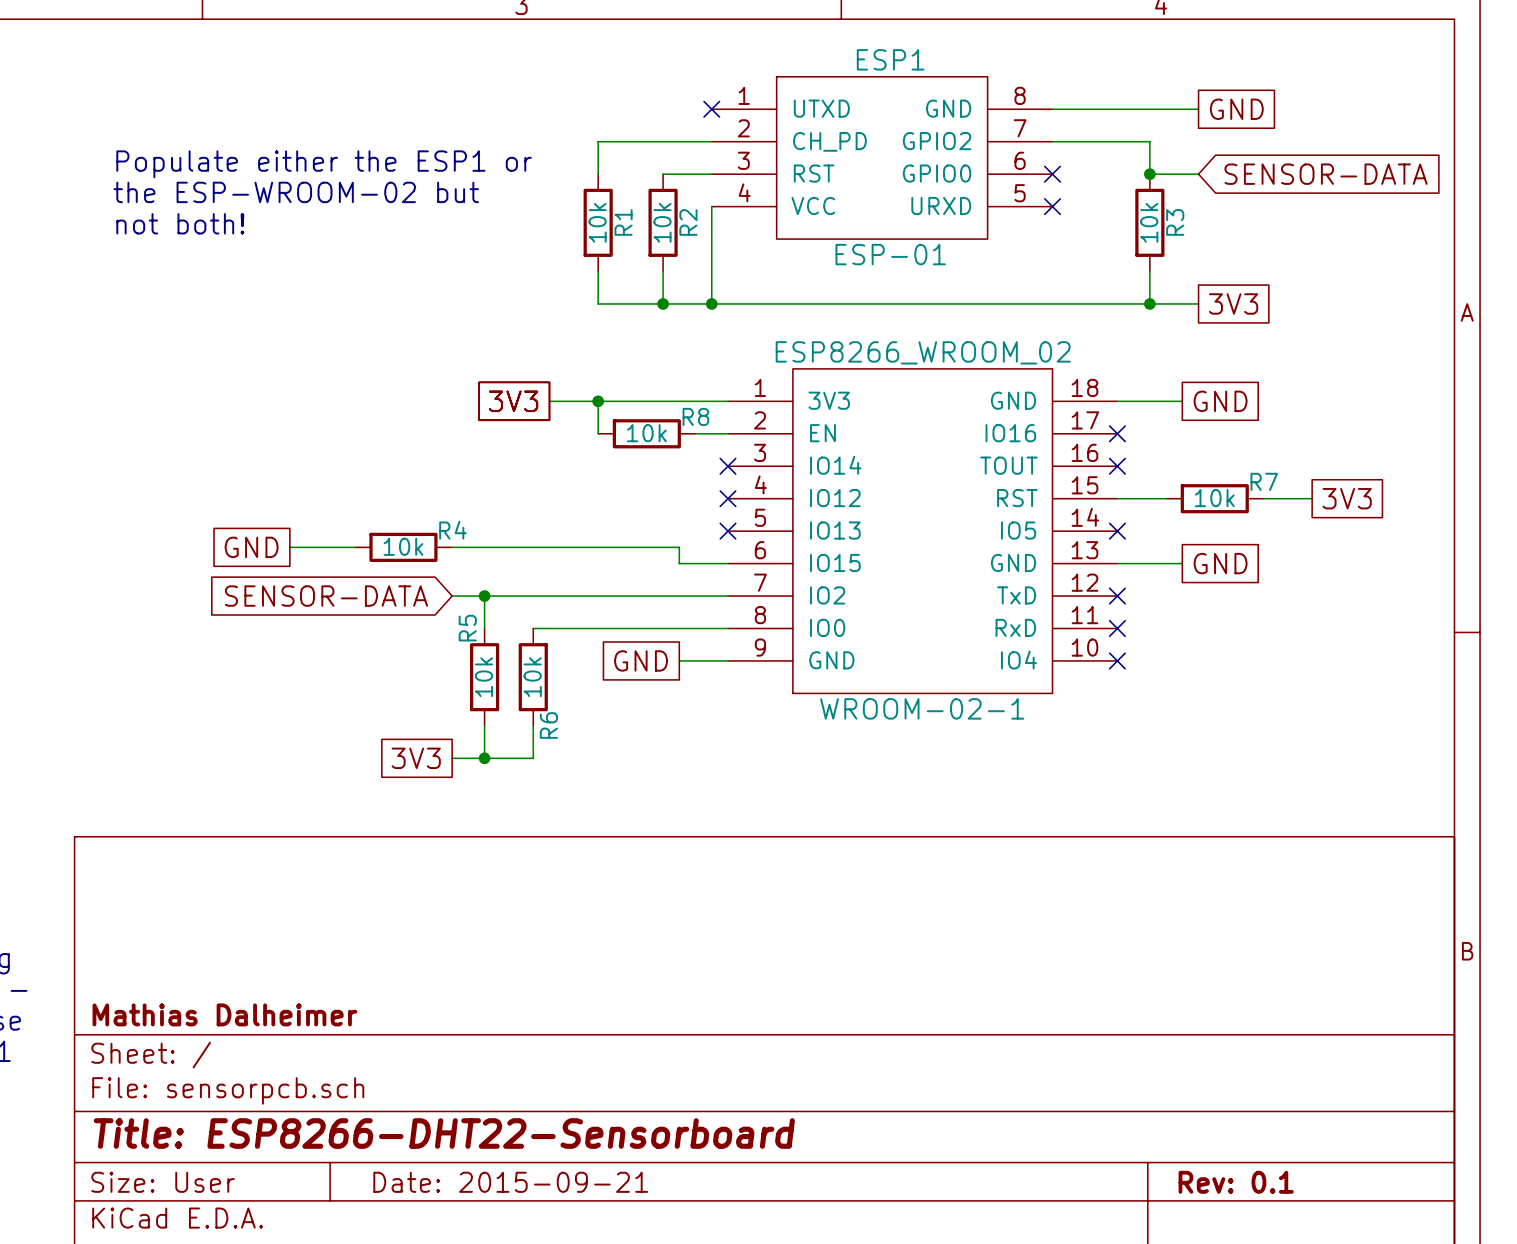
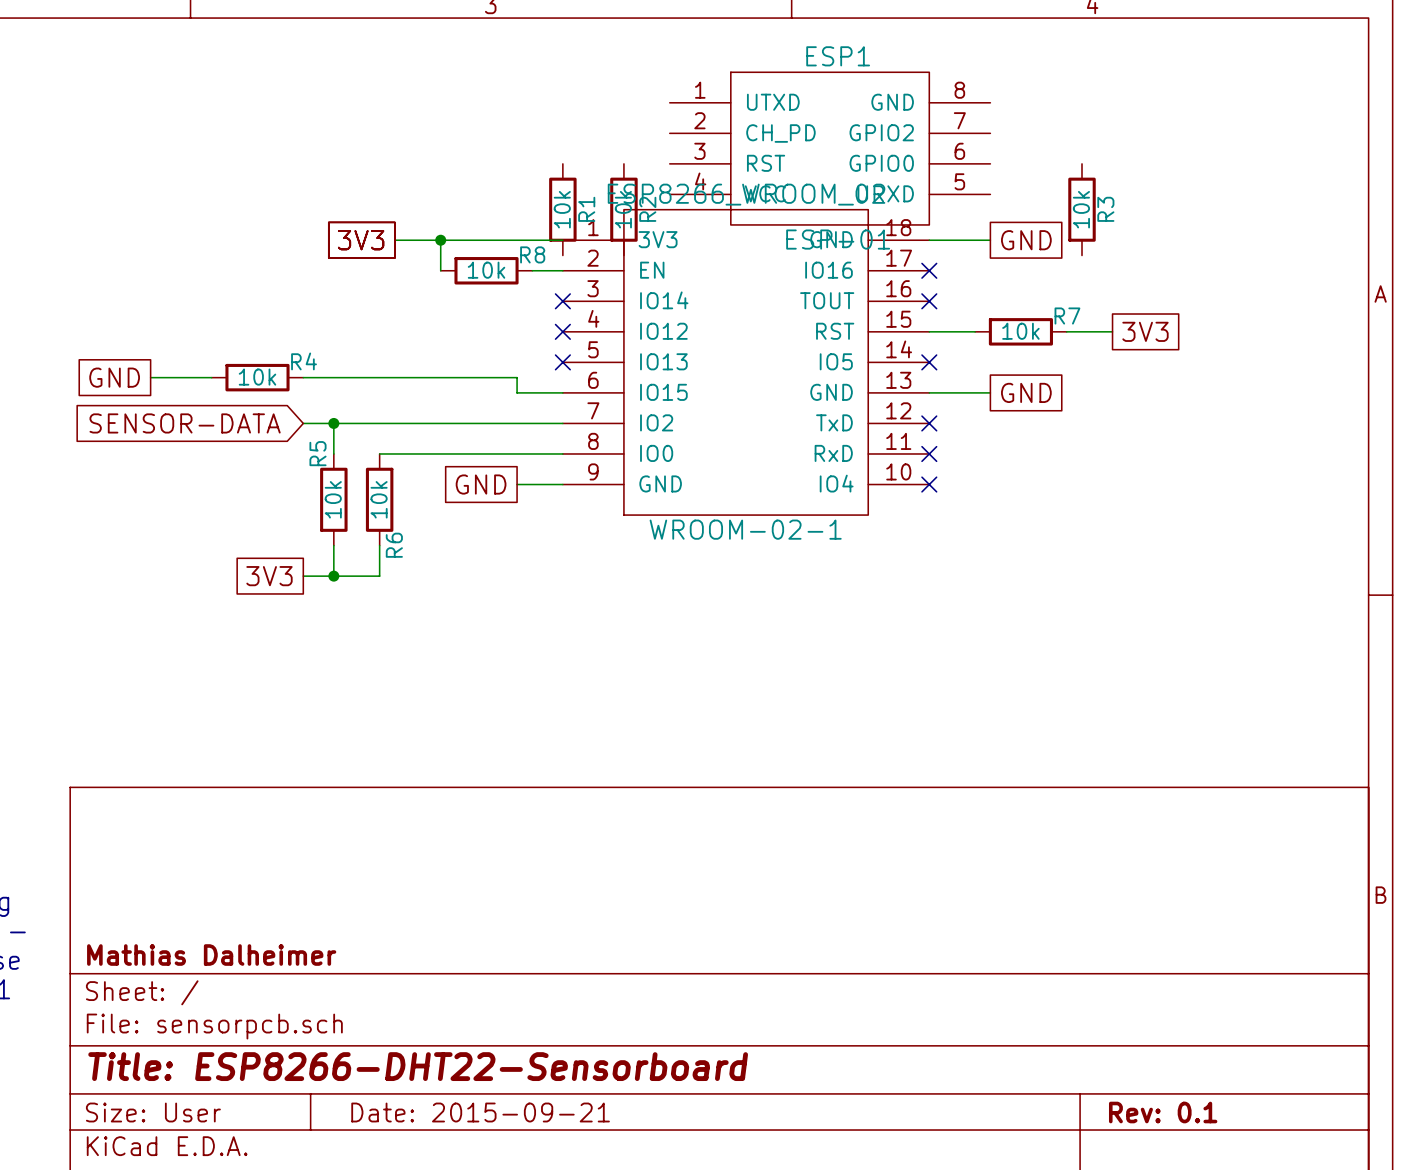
no-connect mark: (711, 109) -> none
wire: (1052, 109) (1198, 109) -> none
global label: GND (1236, 109) -> none
wire: (711, 141) (598, 141) (598, 174) -> none
wire: (1052, 141) (1149, 141) (1149, 174) (1198, 174) -> none
text: Populate either the ESP1 or (324, 164) -> none
wire: (663, 174) (711, 174) -> none
no-connect mark: (1052, 174) -> none
junction: (1149, 174) -> none
global label: SENSOR-DATA (1326, 174) -> none
text: the ESP-WROOM-02 but (296, 192) -> none
wire: (711, 206) (711, 303) -> none
no-connect mark: (1052, 206) -> none
text: not both! (180, 223) -> none
global label: none -> 3V3 (361, 240)
junction: none -> (440, 240)
global label: none -> GND (1026, 240)
wire: (598, 271) (598, 303) (1198, 303) -> none
wire: (1149, 271) (1149, 303) -> none
no-connect mark: none -> (929, 270)
junction: (663, 303) -> none
junction: (711, 303) -> none
junction: (1149, 303) -> none
global label position: 3V3 (1233, 303) -> 3V3 (1145, 331)
no-connect mark: none -> (562, 301)
no-connect mark: none -> (929, 301)
no-connect mark: none -> (562, 331)
no-connect mark: none -> (562, 362)
no-connect mark: none -> (929, 362)
global label: none -> GND (114, 377)
global label: 3V3 (513, 401) -> none
wire: (549, 401) (727, 401) -> (394, 240) (562, 240)
wire: (598, 401) (598, 433) -> (440, 240) (440, 270)
junction: (598, 401) -> none
wire: (1117, 401) (1182, 401) -> (929, 240) (990, 240)
global label: GND (1220, 401) -> none
global label: none -> GND (1026, 392)
R8 position: (646, 433) -> (486, 270)
wire: (695, 433) (727, 433) -> (532, 270) (562, 270)
no-connect mark: (1117, 433) -> none
junction: none -> (333, 423)
no-connect mark: none -> (929, 423)
no-connect mark: (727, 466) -> none
no-connect mark: (1117, 466) -> none
no-connect mark: none -> (929, 453)
no-connect mark: (727, 498) -> none
wire: (1117, 498) (1166, 498) -> (929, 331) (975, 331)
R7 position: (1214, 498) -> (1020, 331)
wire: (1263, 498) (1312, 498) -> (1066, 331) (1112, 331)
global label: 3V3 (1347, 498) -> none
global label: none -> GND (481, 484)
no-connect mark: none -> (929, 484)
no-connect mark: (727, 531) -> none
WROOM-02-1 position: (922, 531) -> (746, 362)
no-connect mark: (1117, 531) -> none
global label: GND (251, 547) -> none
wire: (289, 547) (354, 547) -> (150, 377) (211, 377)
R4 position: (403, 547) -> (257, 377)
wire: (452, 547) (679, 547) (679, 563) (727, 563) -> (303, 377) (517, 377) (517, 392) (562, 392)
wire: (1117, 563) (1182, 563) -> (929, 392) (990, 392)
global label: GND (1220, 563) -> none
global label position: SENSOR-DATA (326, 596) -> SENSOR-DATA (185, 423)
wire: (452, 596) (727, 596) -> (303, 423) (562, 423)
wire: (484, 596) (484, 628) -> (333, 423) (333, 453)
junction: (484, 596) -> none
no-connect mark: (1117, 596) -> none
global label: none -> 3V3 (269, 576)
junction: none -> (333, 576)
wire: (533, 628) (727, 628) -> (379, 453) (562, 453)
no-connect mark: (1117, 628) -> none
global label: GND (641, 660) -> none
wire: (679, 660) (727, 660) -> (517, 484) (562, 484)
no-connect mark: (1117, 660) -> none
R5 position: (484, 677) -> (333, 499)
R6 position: (533, 677) -> (379, 499)
wire: (484, 725) (484, 758) -> (333, 545) (333, 576)
wire: (533, 725) (533, 758) (452, 758) -> (379, 545) (379, 576) (303, 576)
global label: 3V3 (416, 758) -> none
junction: (484, 758) -> none

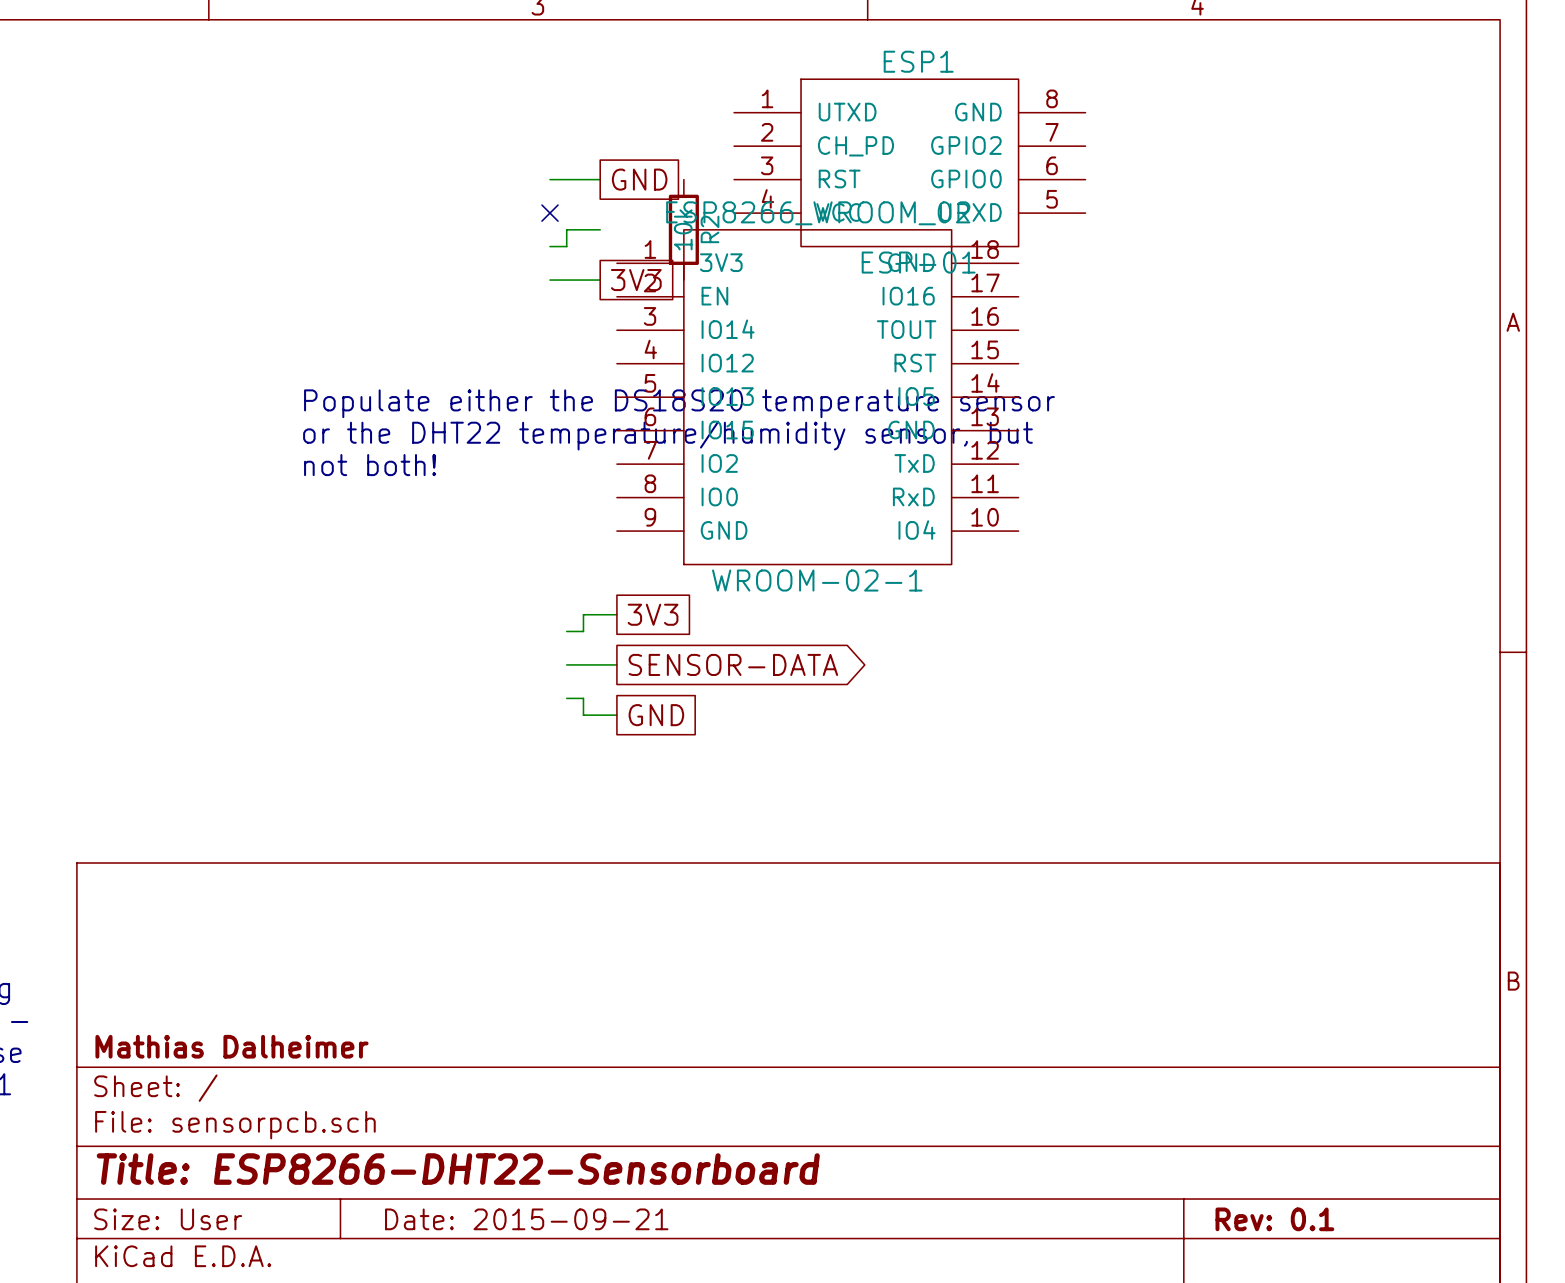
wire: none -> (549, 179) (600, 179)
global label: none -> GND (639, 179)
no-connect mark: none -> (549, 213)
wire: none -> (600, 229) (566, 229) (566, 246) (549, 246)
R1: 10k (562, 209) -> none
R3: 10k (1082, 209) -> none
global label rotation: 0° (361, 240) -> 180° (636, 280)
global label position: 3V3 (361, 240) -> 3V3 (636, 280)
wire: (394, 240) (562, 240) -> none
wire: (440, 240) (440, 270) -> none
junction: (440, 240) -> none
wire: (929, 240) (990, 240) -> none
global label: GND (1026, 240) -> none
wire: none -> (549, 280) (600, 280)
R8: 10k (486, 270) -> none
wire: (532, 270) (562, 270) -> none
no-connect mark: (929, 270) -> none
no-connect mark: (562, 301) -> none
no-connect mark: (929, 301) -> none
no-connect mark: (562, 331) -> none
wire: (929, 331) (975, 331) -> none
R7: 10k (1020, 331) -> none
wire: (1066, 331) (1112, 331) -> none
global label: 3V3 (1145, 331) -> none
no-connect mark: (562, 362) -> none
no-connect mark: (929, 362) -> none
text: none -> Populate either the DS18S20 temperature sensor (679, 403)
global label: GND (114, 377) -> none
wire: (150, 377) (211, 377) -> none
R4: 10k (257, 377) -> none
wire: (303, 377) (517, 377) (517, 392) (562, 392) -> none
wire: (929, 392) (990, 392) -> none
global label: GND (1026, 392) -> none
text: none -> or the DHT22 temperature/humidity sensor, but (667, 435)
global label: SENSOR-DATA (185, 423) -> none
wire: (303, 423) (562, 423) -> none
wire: (333, 423) (333, 453) -> none
junction: (333, 423) -> none
no-connect mark: (929, 423) -> none
text: none -> not both! (370, 465)
wire: (379, 453) (562, 453) -> none
no-connect mark: (929, 453) -> none
global label: GND (481, 484) -> none
wire: (517, 484) (562, 484) -> (566, 664) (616, 664)
no-connect mark: (929, 484) -> none
R5: 10k (333, 499) -> none
R6: 10k (379, 499) -> none
wire: (333, 545) (333, 576) -> none
wire: (379, 545) (379, 576) (303, 576) -> none
wire: none -> (616, 614) (583, 614) (583, 631) (566, 631)
global label: none -> 3V3 (653, 614)
global label: 3V3 (269, 576) -> none
junction: (333, 576) -> none
global label: none -> SENSOR-DATA (733, 664)
wire: none -> (566, 698) (583, 698) (583, 715) (616, 715)
global label: none -> GND (656, 715)

